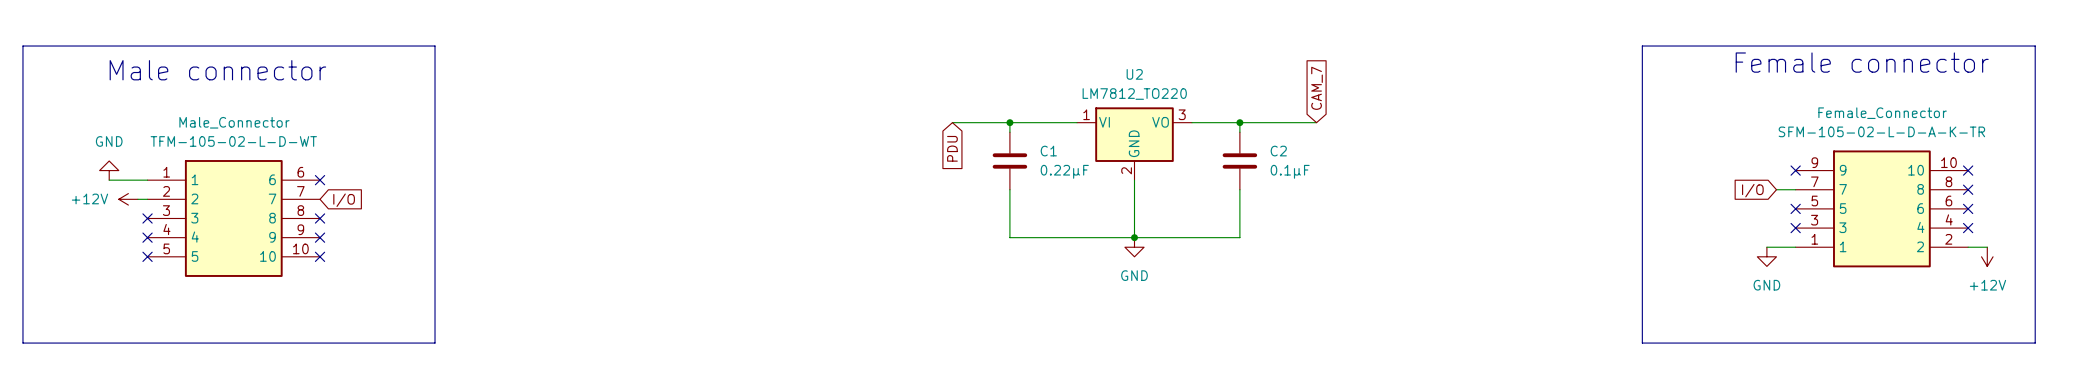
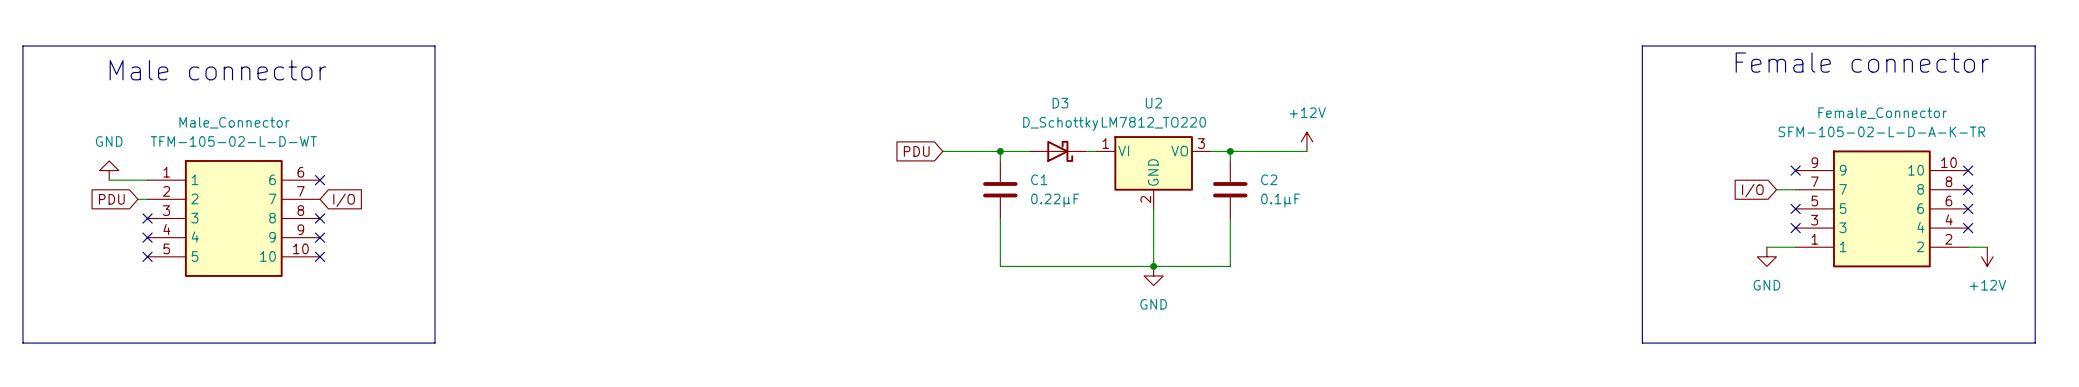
global label: CAM_7 (1317, 88) -> none
wire: (952, 122) (1077, 122) -> none
wire: (1009, 122) (1009, 132) -> (1000, 151) (1000, 160)
junction position: (1009, 122) -> (1000, 151)
wire: (1191, 122) (1316, 122) -> none
wire: (1239, 122) (1239, 132) -> (1230, 151) (1230, 160)
junction position: (1239, 122) -> (1230, 151)
power symbol: none -> +12V (1306, 141)
U2 position: (1134, 143) -> (1153, 172)
global label rotation: 0° (952, 148) -> 90° clockwise (916, 151)
wire: none -> (942, 151) (1029, 151)
D3: none -> D_Schottky (1057, 151)
wire: none -> (1086, 151) (1096, 151)
wire: none -> (1211, 151) (1306, 151)
C1 position: (1009, 160) -> (1000, 189)
C2 position: (1239, 160) -> (1230, 189)
wire: (1134, 180) (1134, 237) -> (1153, 208) (1153, 266)
wire: (1009, 189) (1009, 237) (1239, 237) (1239, 189) -> (1000, 218) (1000, 266) (1230, 266) (1230, 218)
global label: none -> PDU (111, 199)
power symbol: +12V (128, 199) -> none
junction position: (1134, 237) -> (1153, 266)
power symbol position: GND (1134, 247) -> GND (1153, 275)

